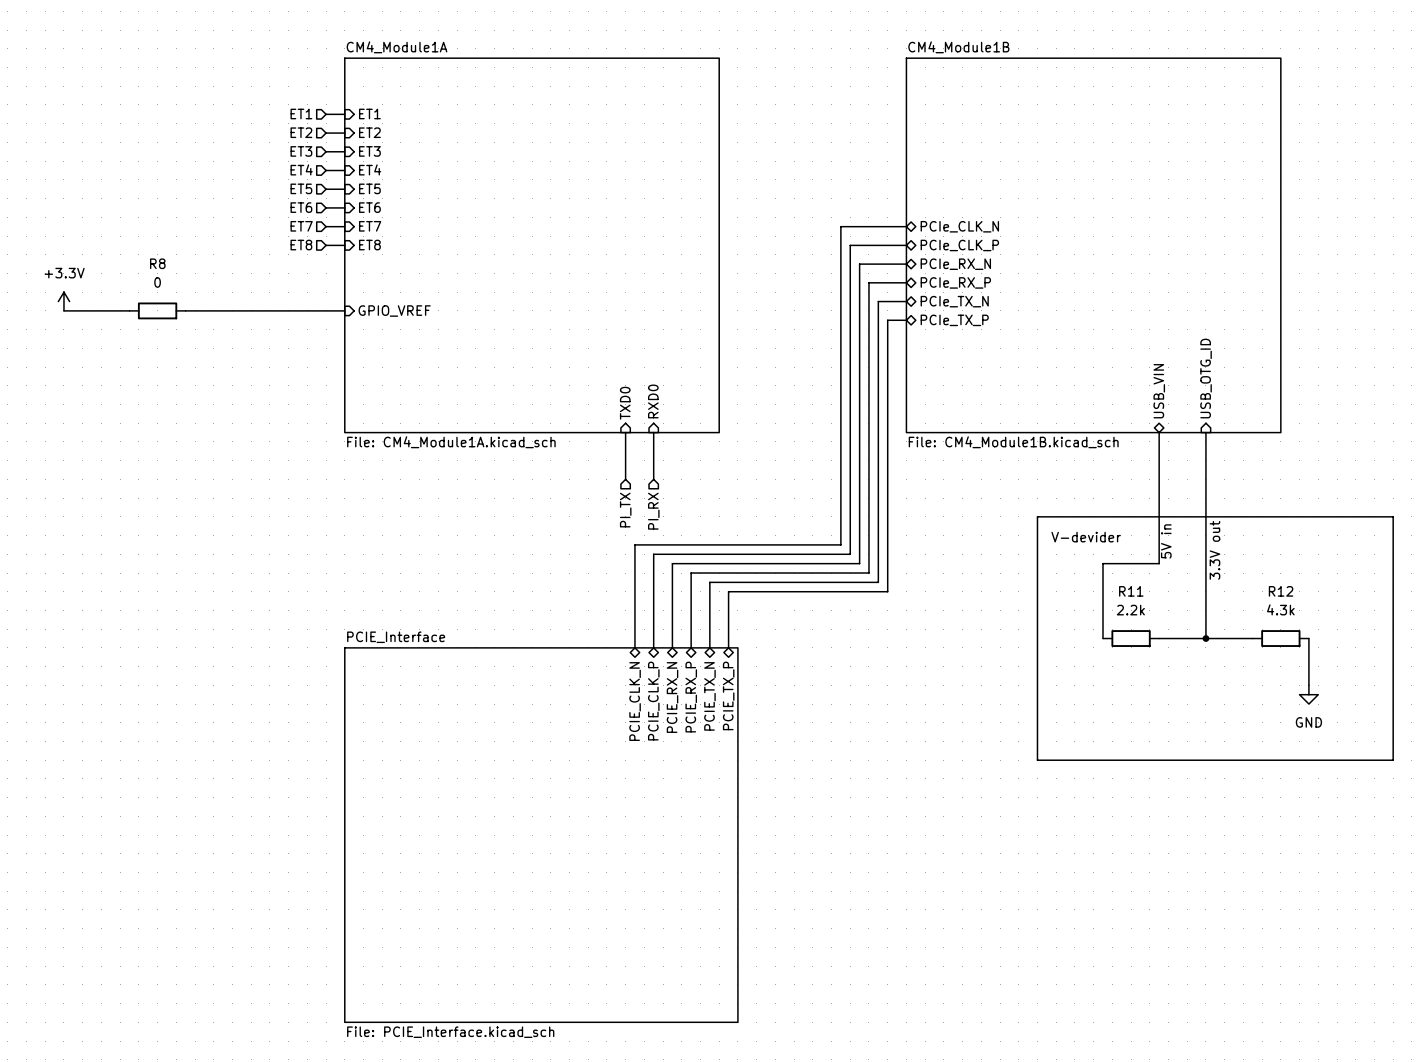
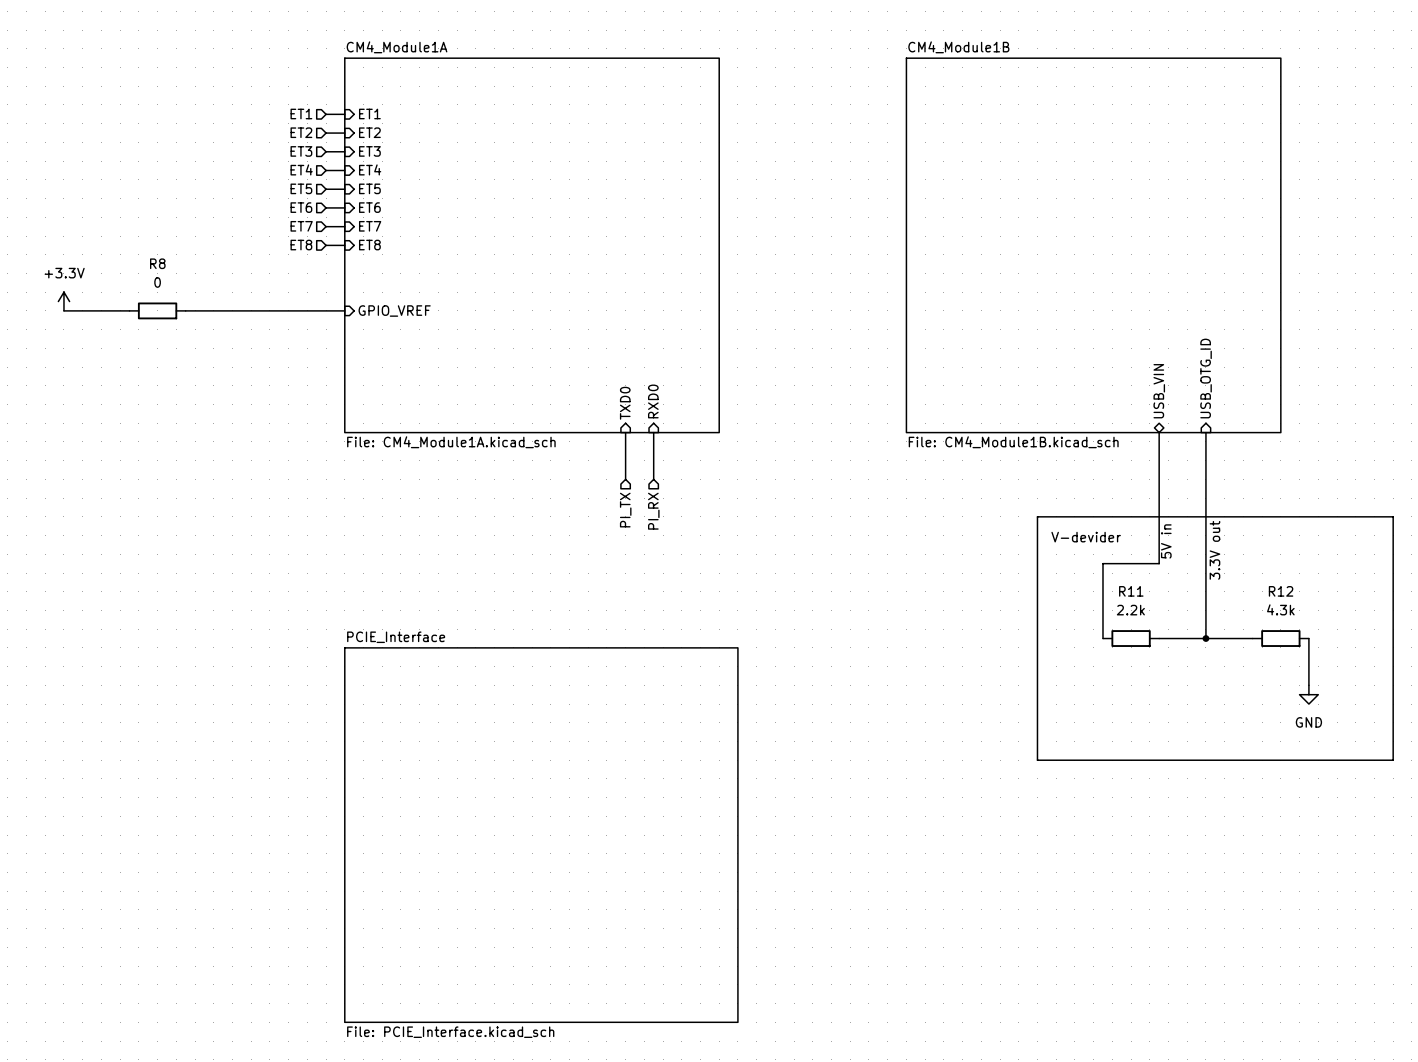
wire: (906, 226) (840, 226) (840, 544) (634, 544) (634, 647) -> none
sheet pin: PCIe_CLK_N (959, 226) -> none
wire: (906, 245) (850, 245) (850, 554) (653, 554) (653, 647) -> none
sheet pin: PCIe_CLK_P (959, 245) -> none
wire: (906, 264) (859, 264) (859, 563) (672, 563) (672, 647) -> none
sheet pin: PCIe_RX_N (955, 264) -> none
wire: (906, 282) (868, 282) (868, 573) (691, 573) (691, 647) -> none
sheet pin: PCIe_RX_P (955, 282) -> none
wire: (906, 301) (878, 301) (878, 582) (709, 582) (709, 647) -> none
sheet pin: PCIe_TX_N (954, 301) -> none
wire: (906, 320) (887, 320) (887, 591) (728, 591) (728, 647) -> none
sheet pin: PCIe_TX_P (954, 320) -> none
sheet pin: PCIE_TX_P (728, 695) -> none
sheet pin: PCIE_TX_N (709, 696) -> none
sheet pin: PCIE_RX_N (672, 697) -> none
sheet pin: PCIE_RX_P (691, 697) -> none
sheet pin: PCIE_CLK_N (635, 701) -> none
sheet pin: PCIE_CLK_P (653, 701) -> none

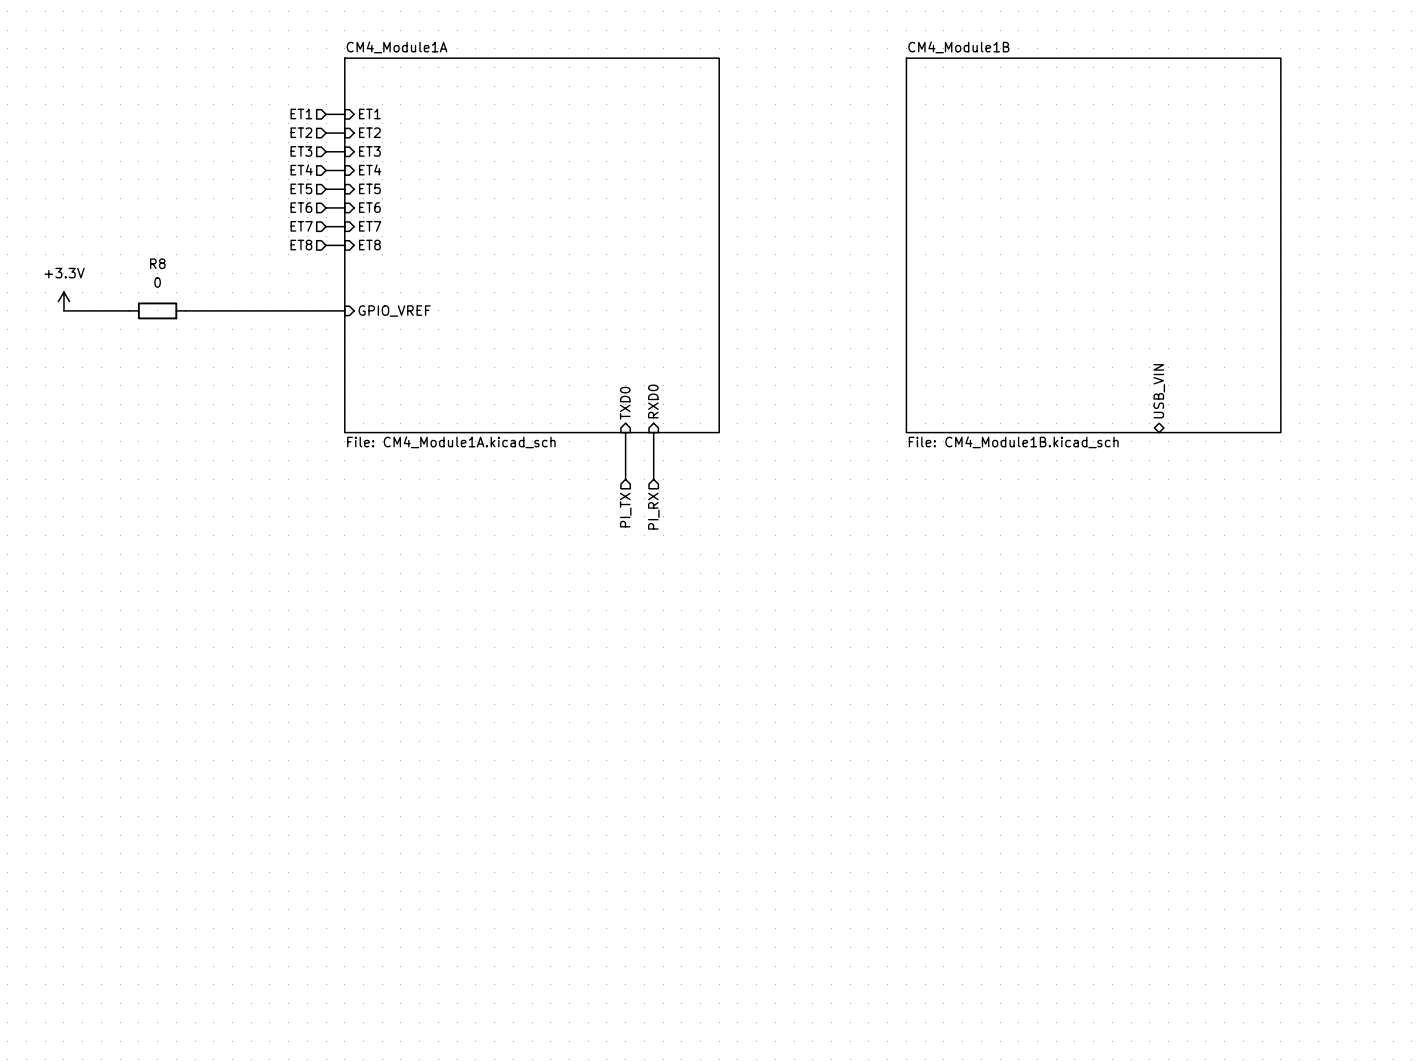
sheet pin: USB_OTG_ID (1206, 378) -> none
wire: (1159, 432) (1159, 563) (1102, 563) (1102, 638) -> none
wire: (1205, 432) (1205, 638) -> none
line: (1037, 516) (1393, 516) (1393, 760) (1037, 760) (1037, 516) -> none
text: V-devider (1086, 537) -> none
text: 5V in (1166, 541) -> none
text: 3.3V out (1214, 550) -> none
R11: 2.2k (1131, 638) -> none
wire: (1159, 638) (1252, 638) -> none
junction: (1205, 638) -> none
R12: 4.3k (1280, 638) -> none
wire: (1308, 638) (1308, 685) -> none
power symbol: GND (1308, 694) -> none
sheet PCIE_Interface: File: PCIE_Interface.kicad_sch (541, 835) -> none

